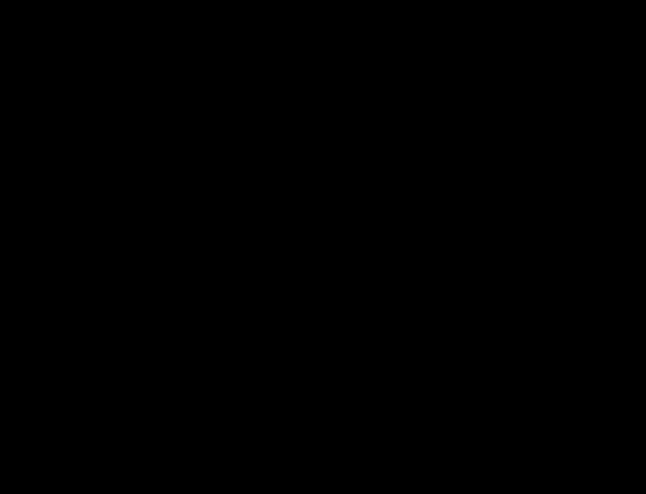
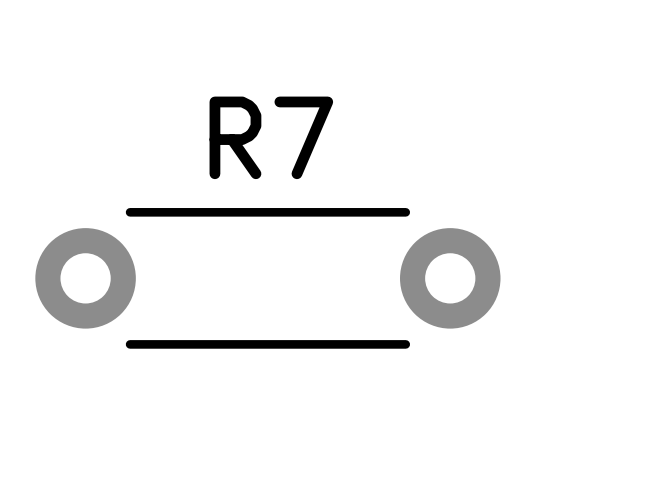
R7: none -> (267, 278)

